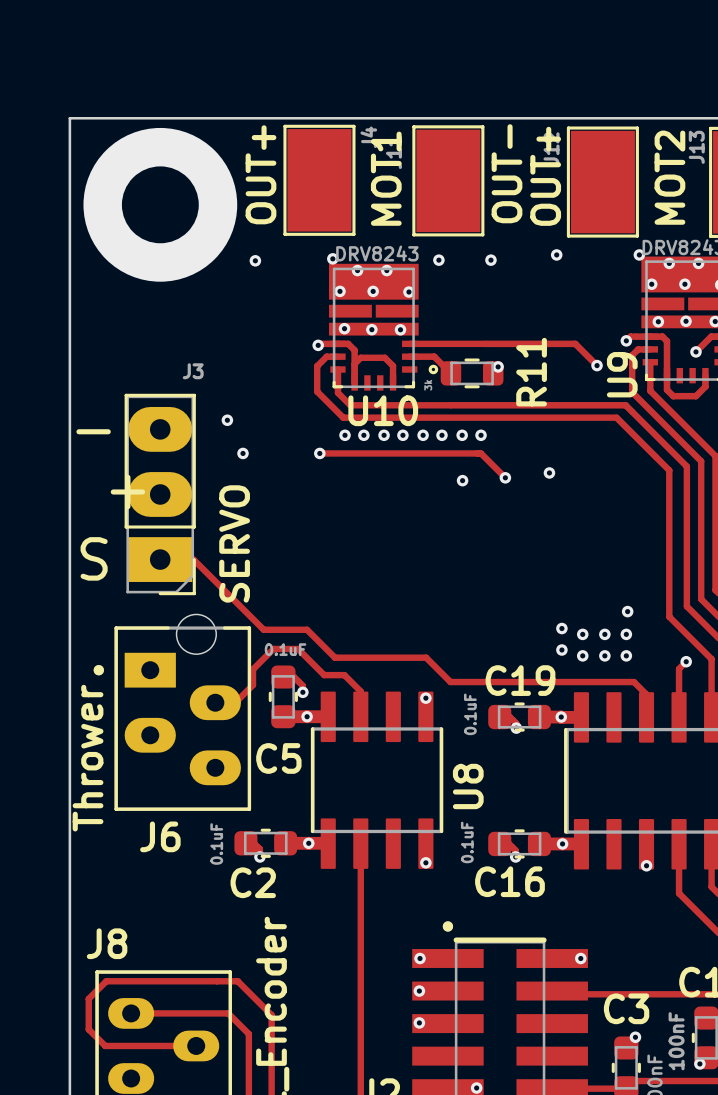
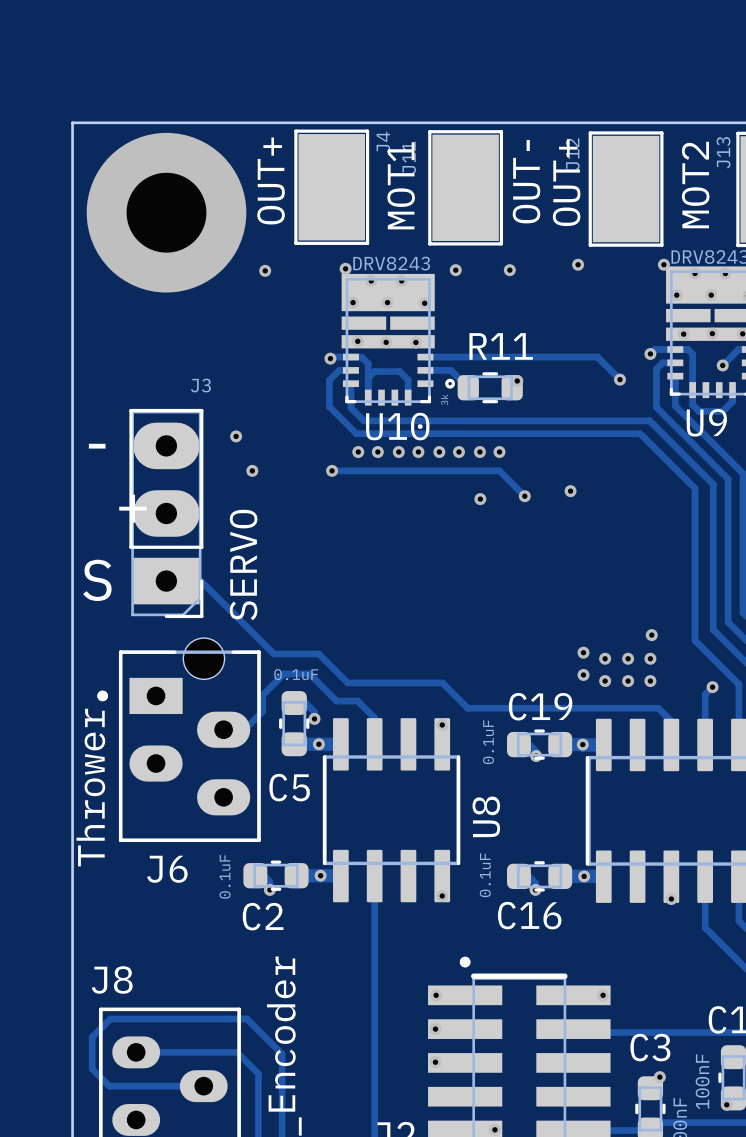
R11 name rotation: 0° (531, 372) -> 90° clockwise (501, 346)
U9 name rotation: 0° (622, 374) -> 90° clockwise (706, 422)
U9 name position: U9 (622, 374) -> U9 (706, 422)

